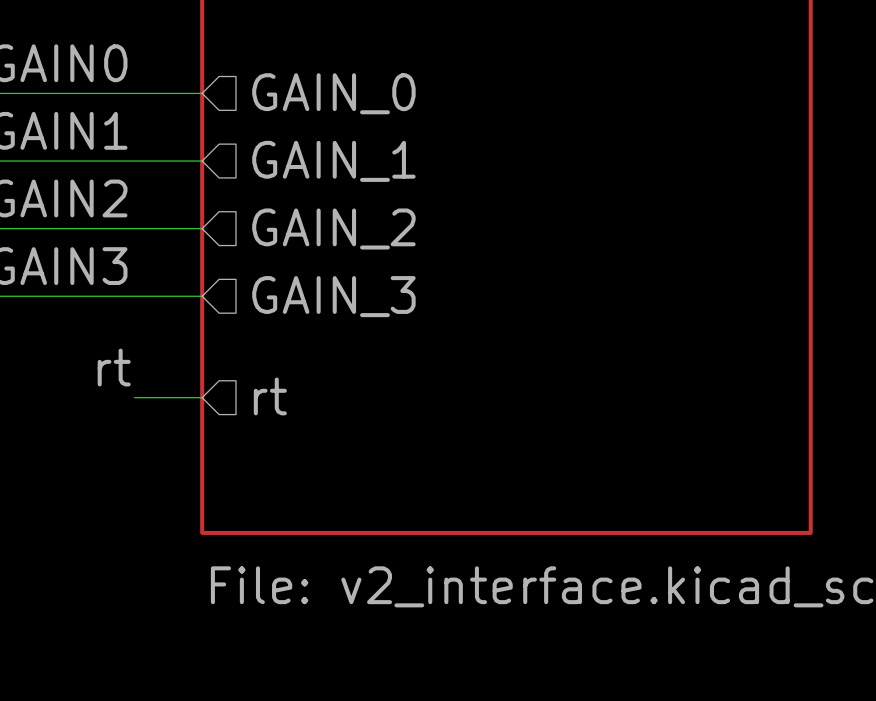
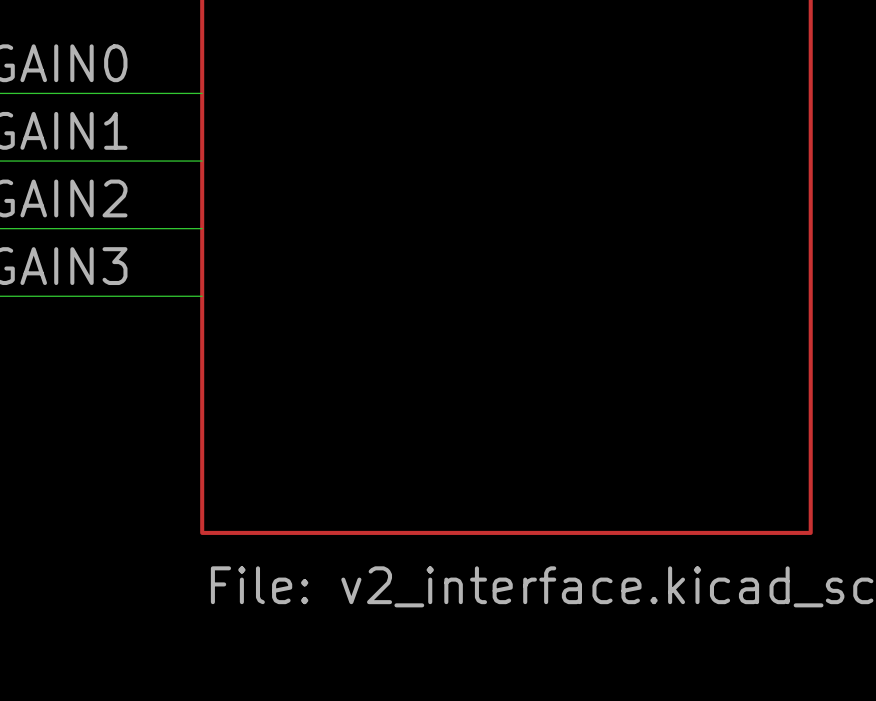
sheet pin: GAIN_0 (333, 93) -> none
sheet pin: GAIN_1 (333, 161) -> none
sheet pin: GAIN_2 (333, 228) -> none
sheet pin: GAIN_3 (333, 296) -> none
label: rt (114, 367) -> none
sheet pin: rt (270, 396) -> none
wire: (134, 397) (202, 397) -> none

